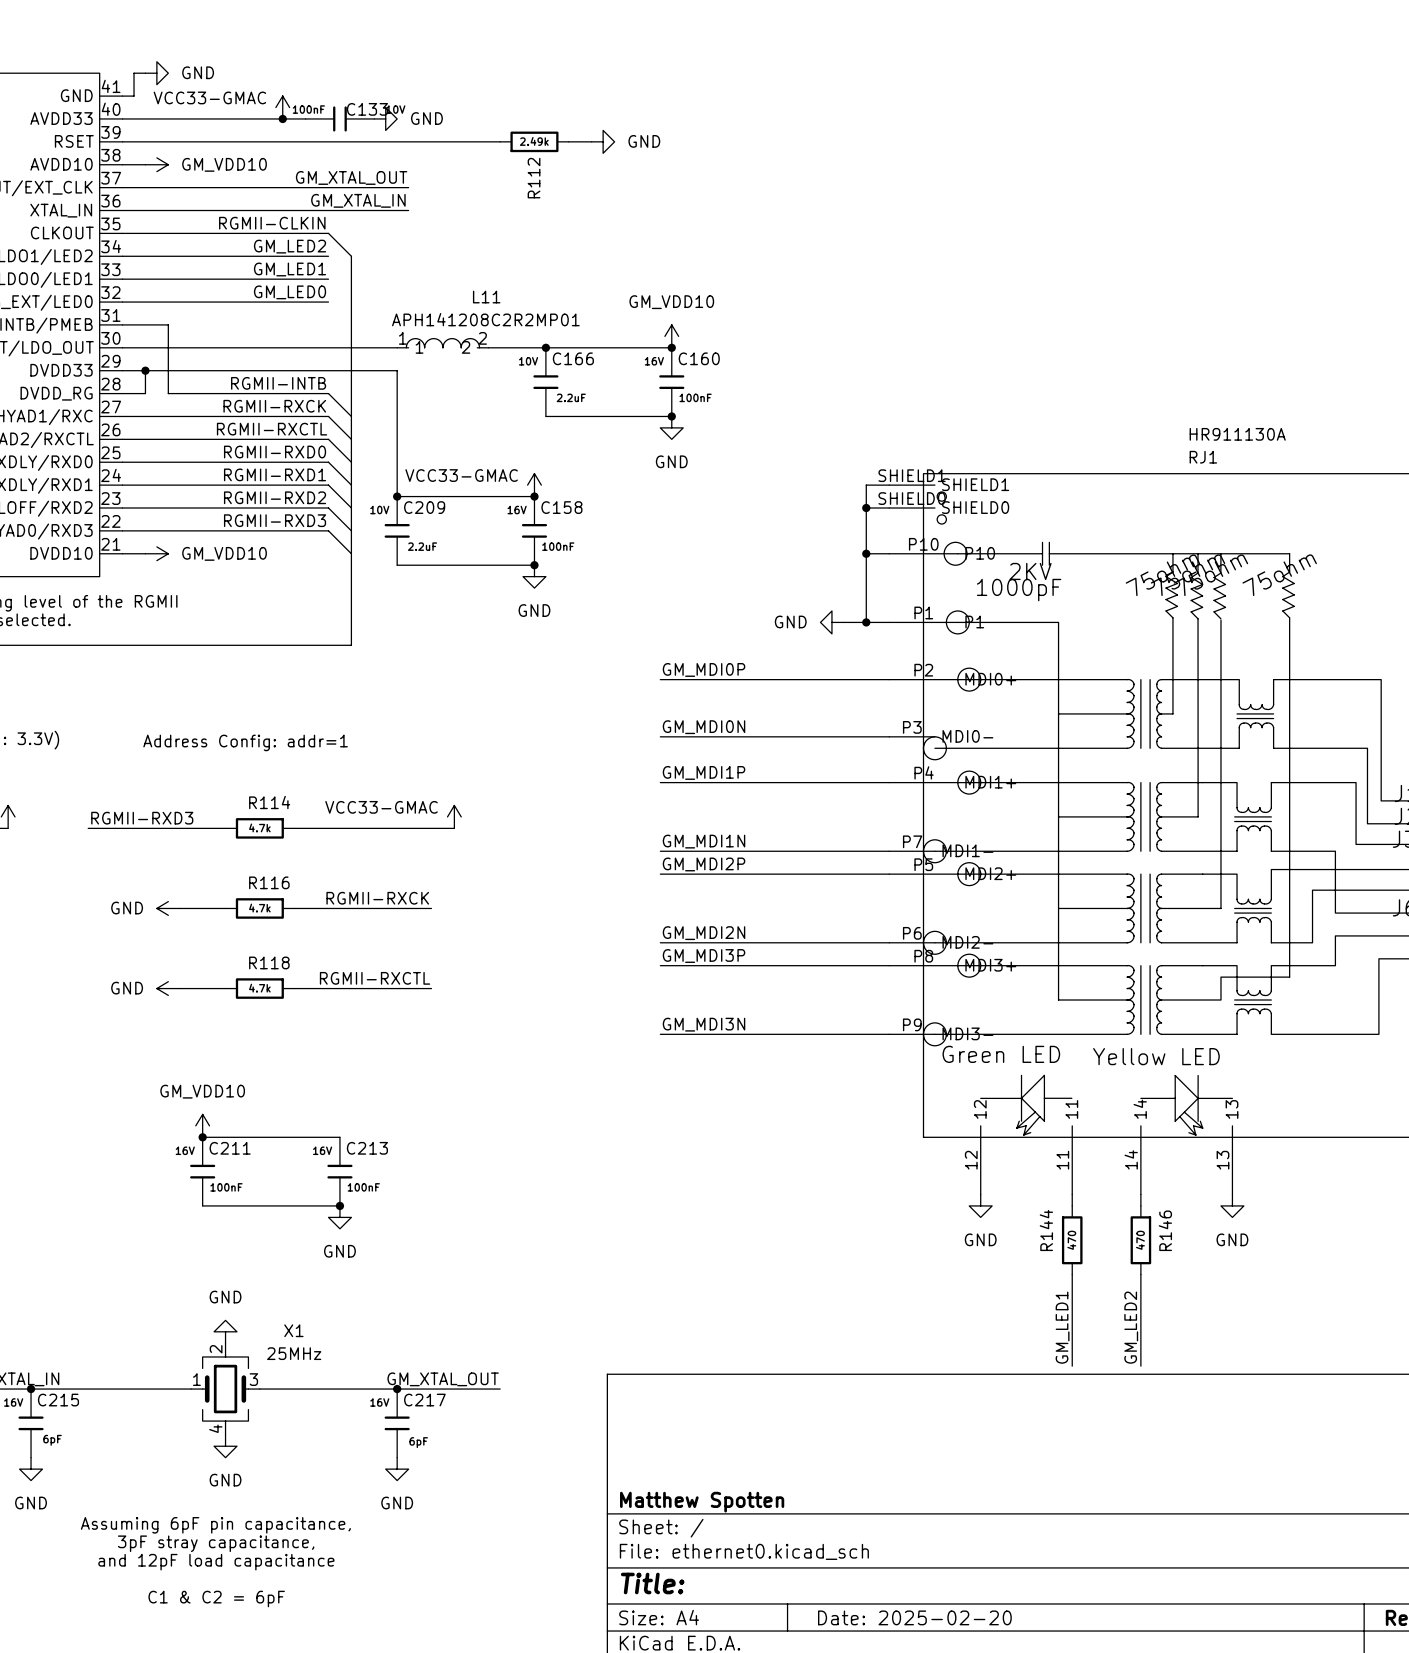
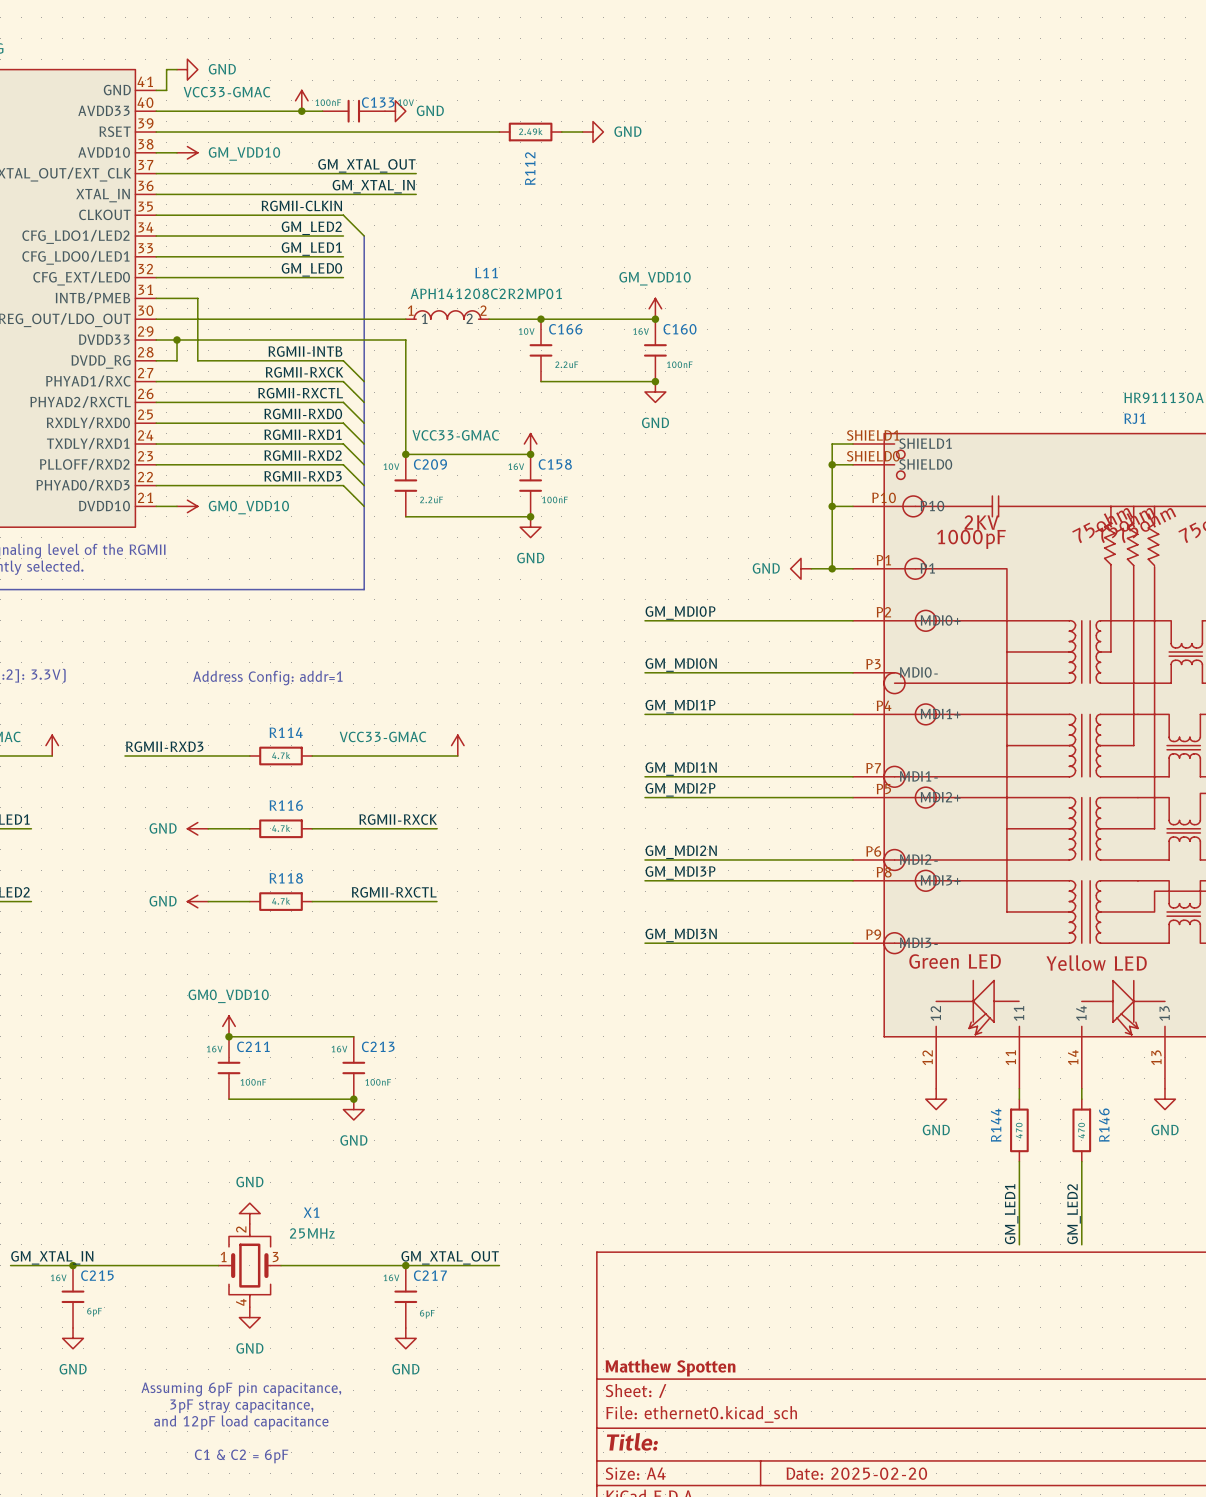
power symbol: GM_VDD10 (156, 553) -> GM0_VDD10 (187, 506)
power symbol: GM_VDD10 (202, 1125) -> GM0_VDD10 (229, 1026)

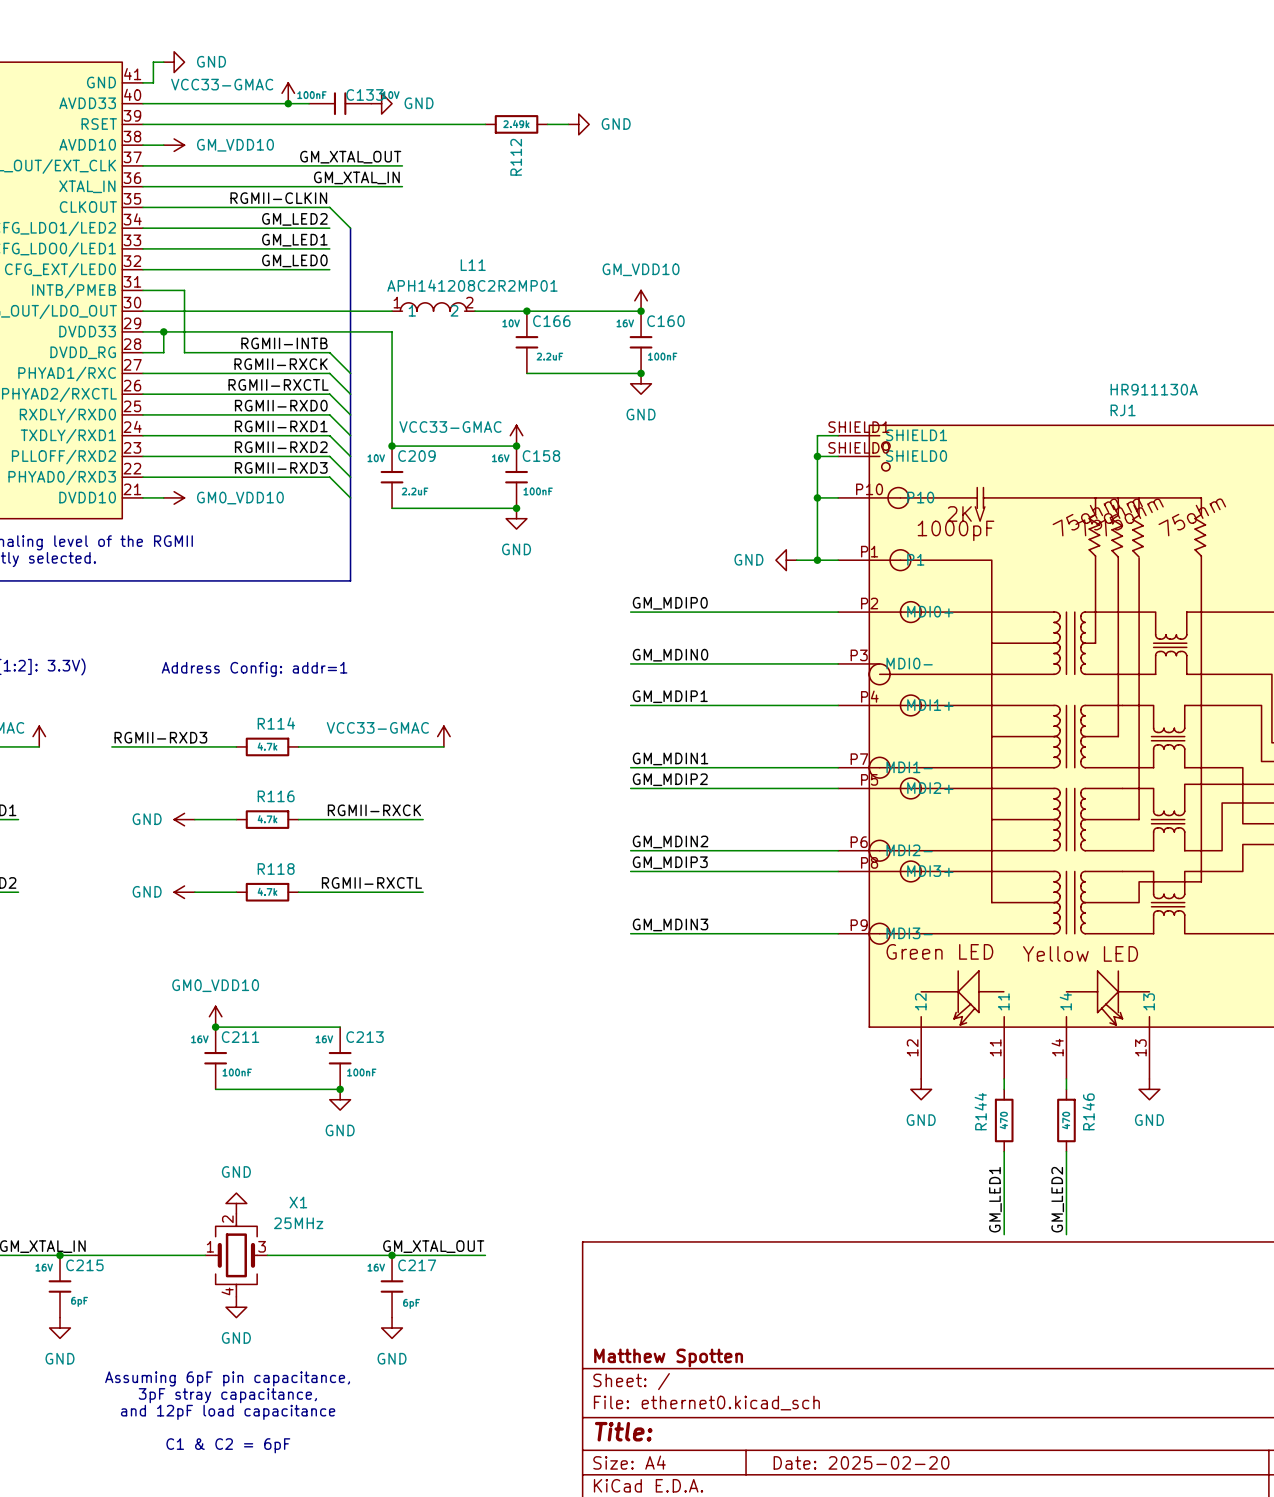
label: GM_MDI0P (680, 613) -> GM_MDIP0 (670, 603)
label: GM_MDI0N (681, 665) -> GM_MDIN0 (670, 655)
label: GM_MDI1P (680, 706) -> GM_MDIP1 (670, 696)
label: GM_MDI1N (681, 769) -> GM_MDIN1 (670, 758)
label: GM_MDI2P (680, 789) -> GM_MDIP2 (670, 779)
label: GM_MDI2N (681, 852) -> GM_MDIN2 (670, 841)
label: GM_MDI3P (680, 873) -> GM_MDIP3 (670, 862)
label: GM_MDI3N (681, 935) -> GM_MDIN3 (670, 924)

